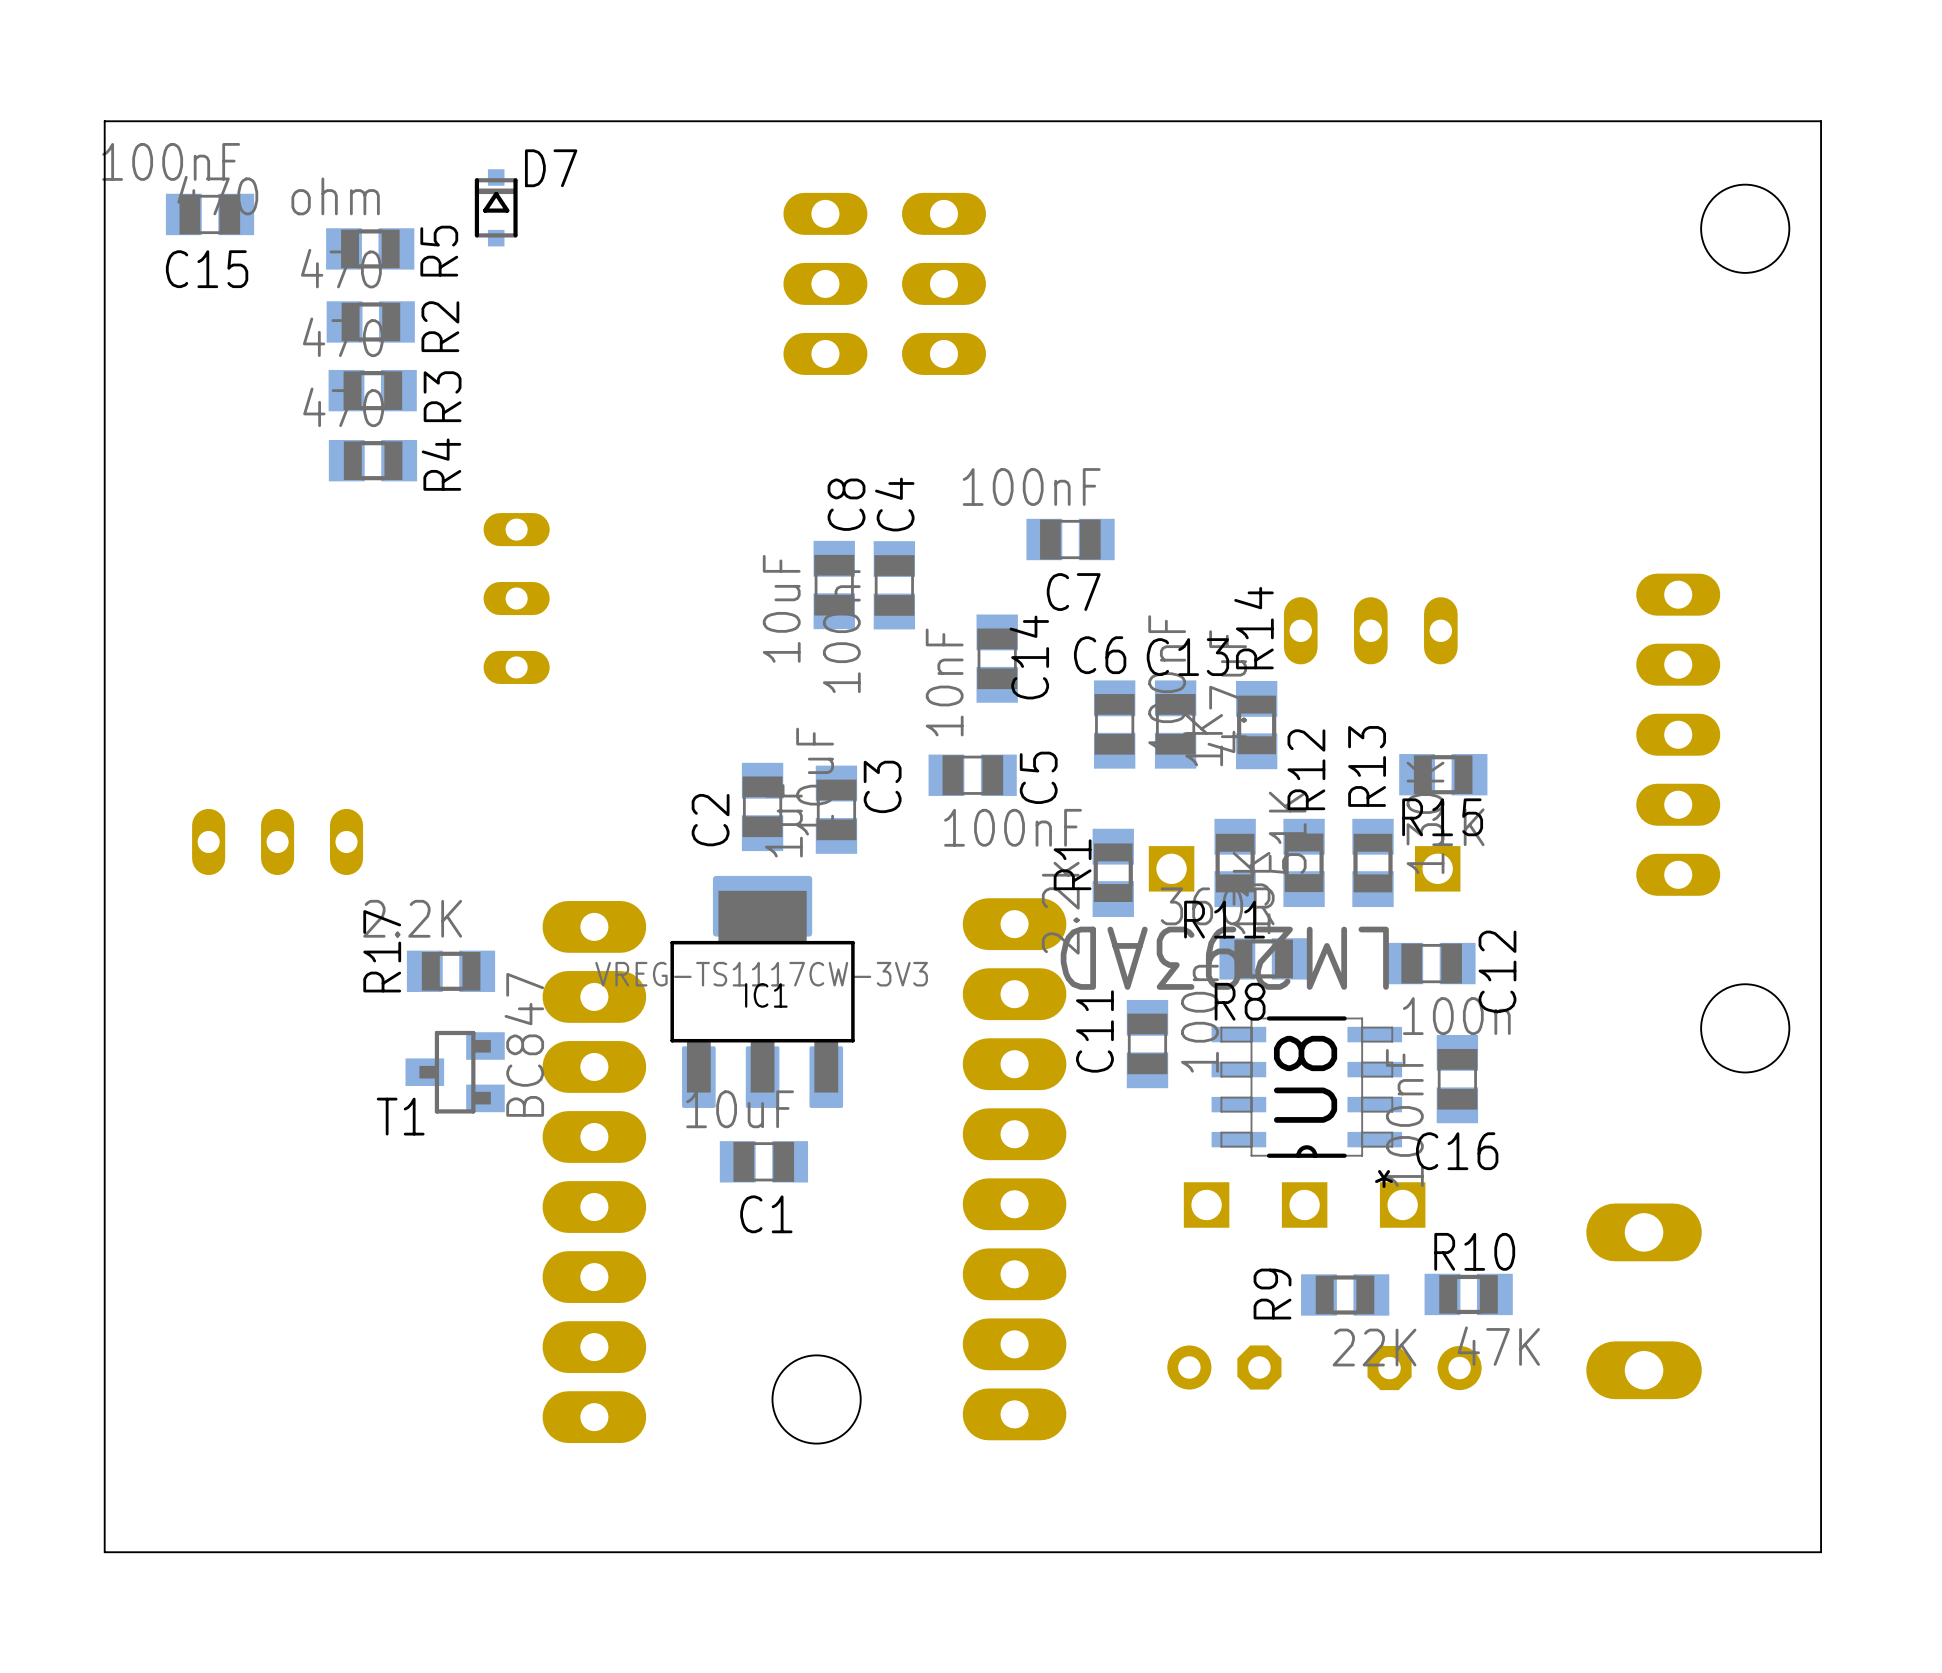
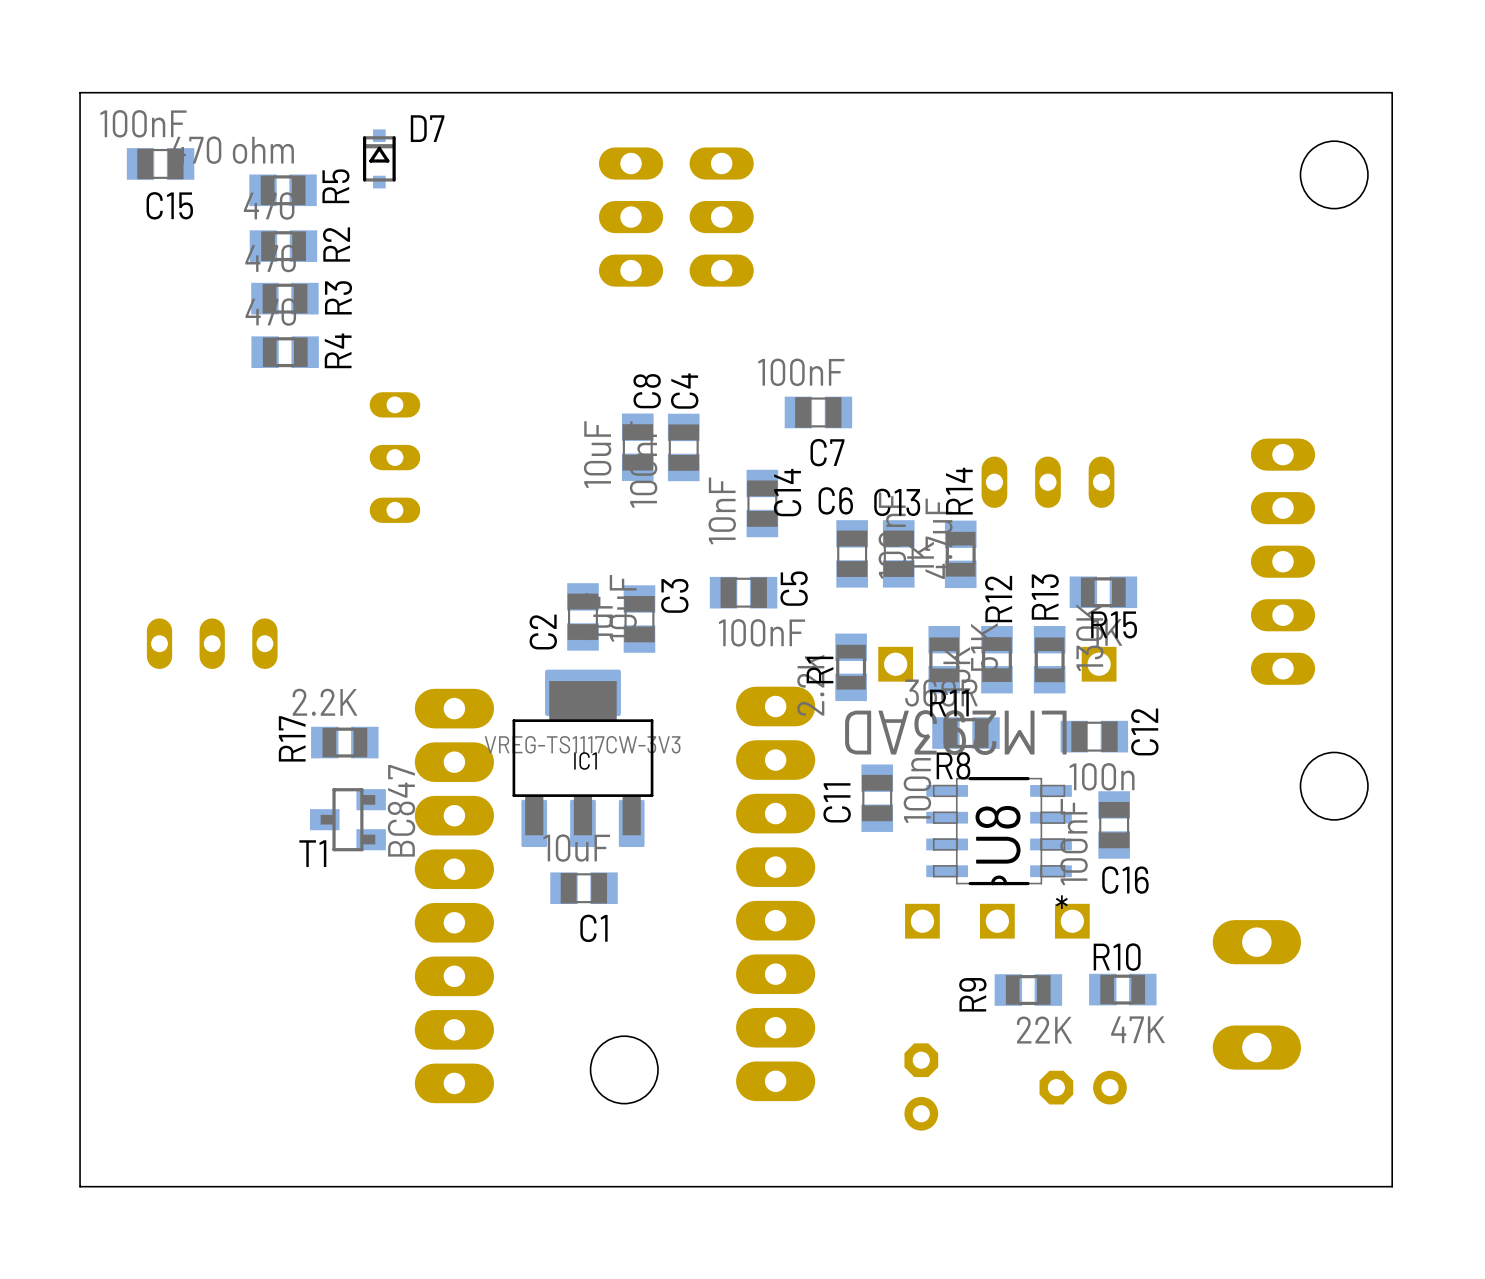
part rotation: 0° (1224, 1367) -> 90° counterclockwise (921, 1086)
part position: (1424, 1368) -> (1083, 1087)

